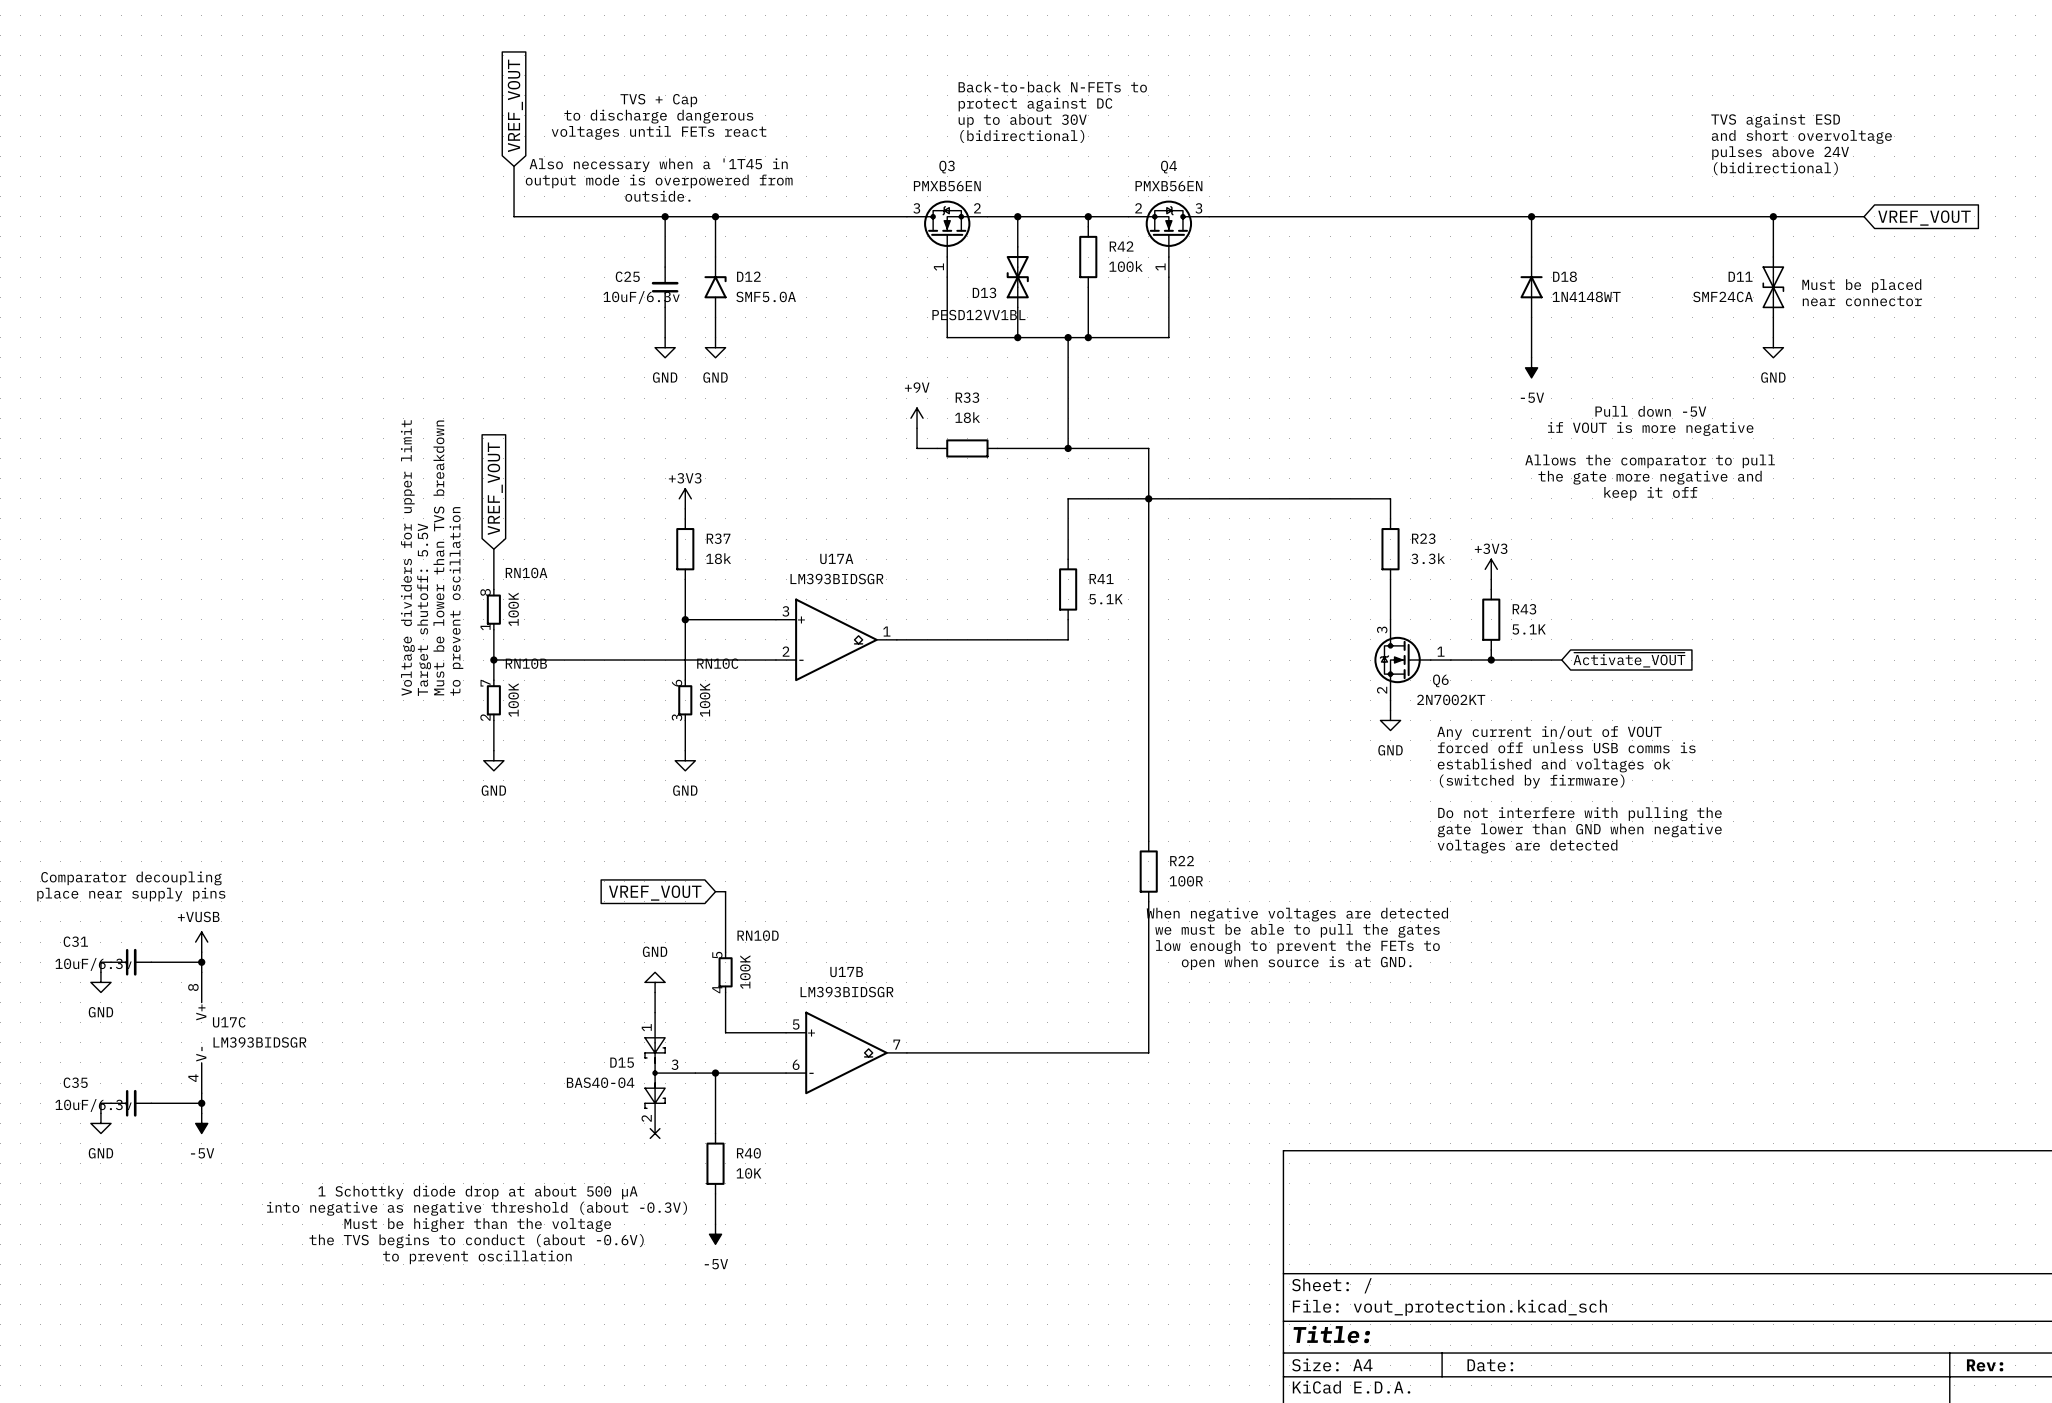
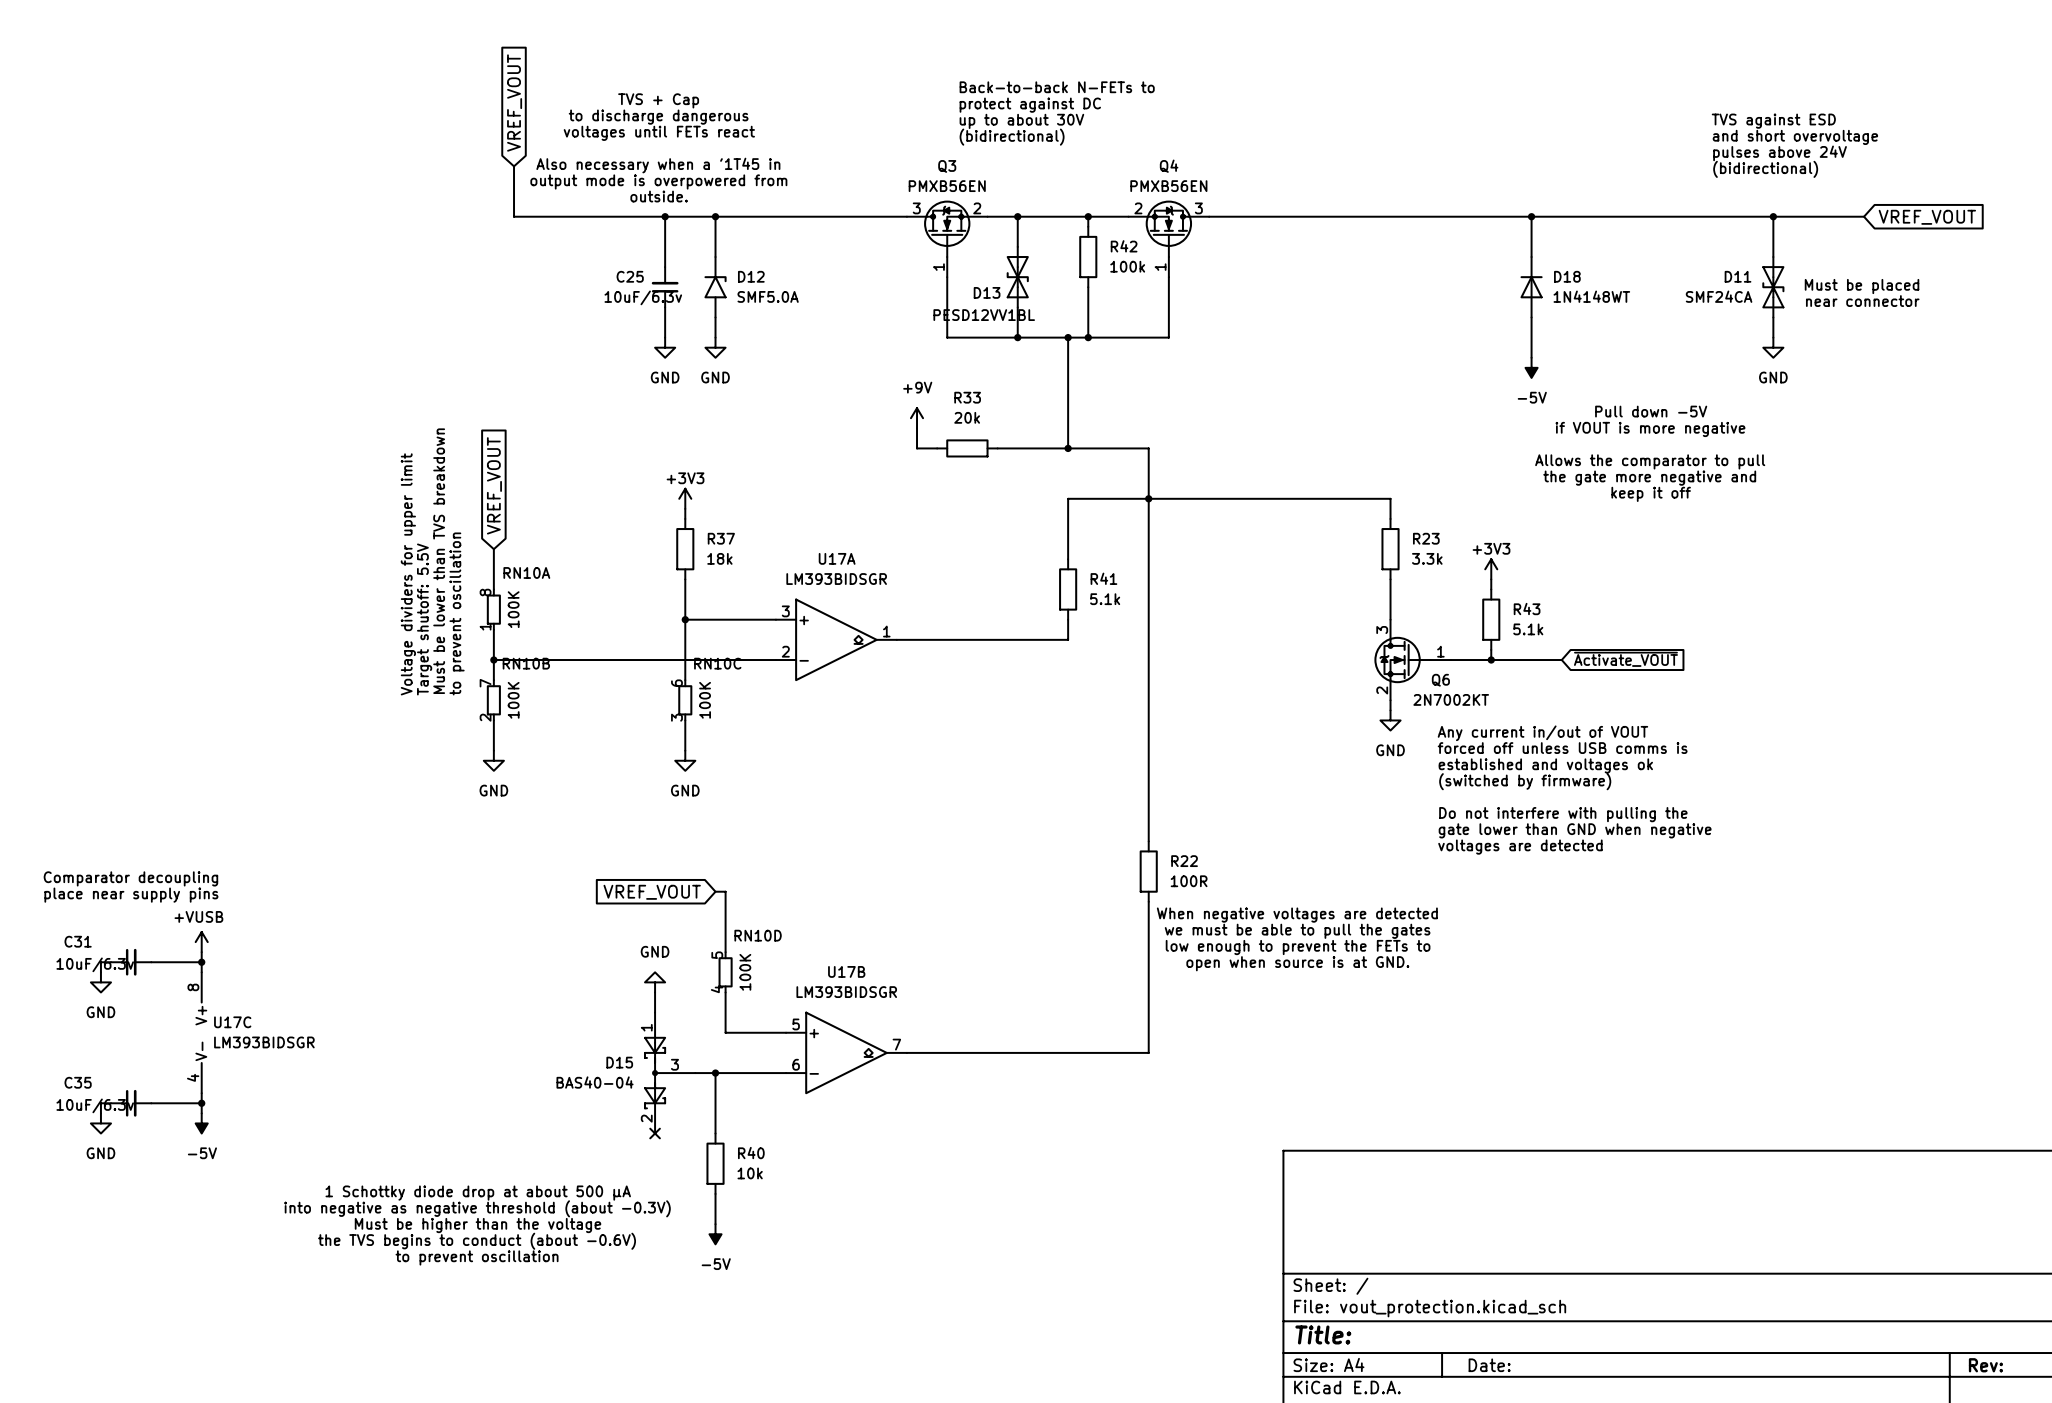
R33 value: 18k (967, 417) -> 20k (967, 417)
R41 value: 5.1K (1105, 599) -> 5.1k (1105, 599)
R43 value: 5.1K (1529, 629) -> 5.1k (1528, 629)
R40 value: 10K (748, 1173) -> 10k (750, 1173)

